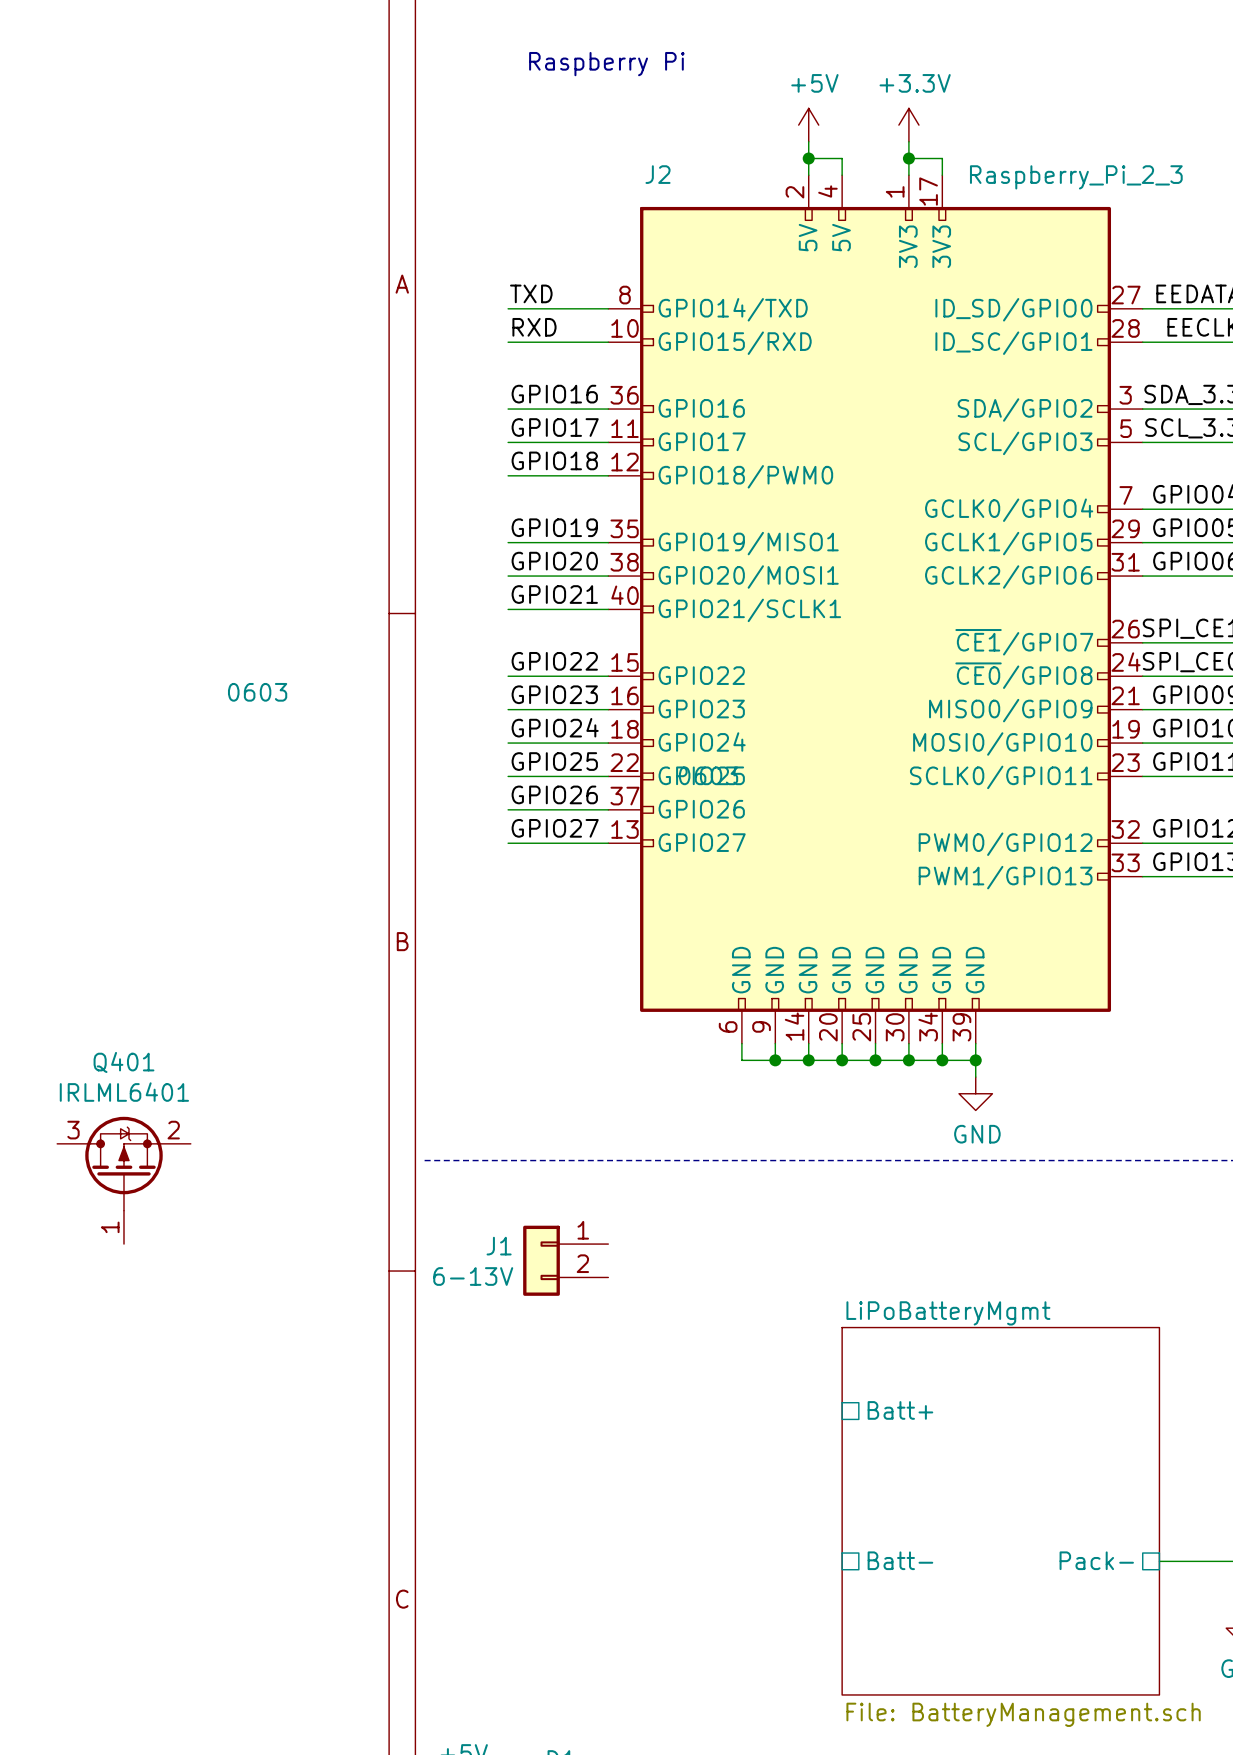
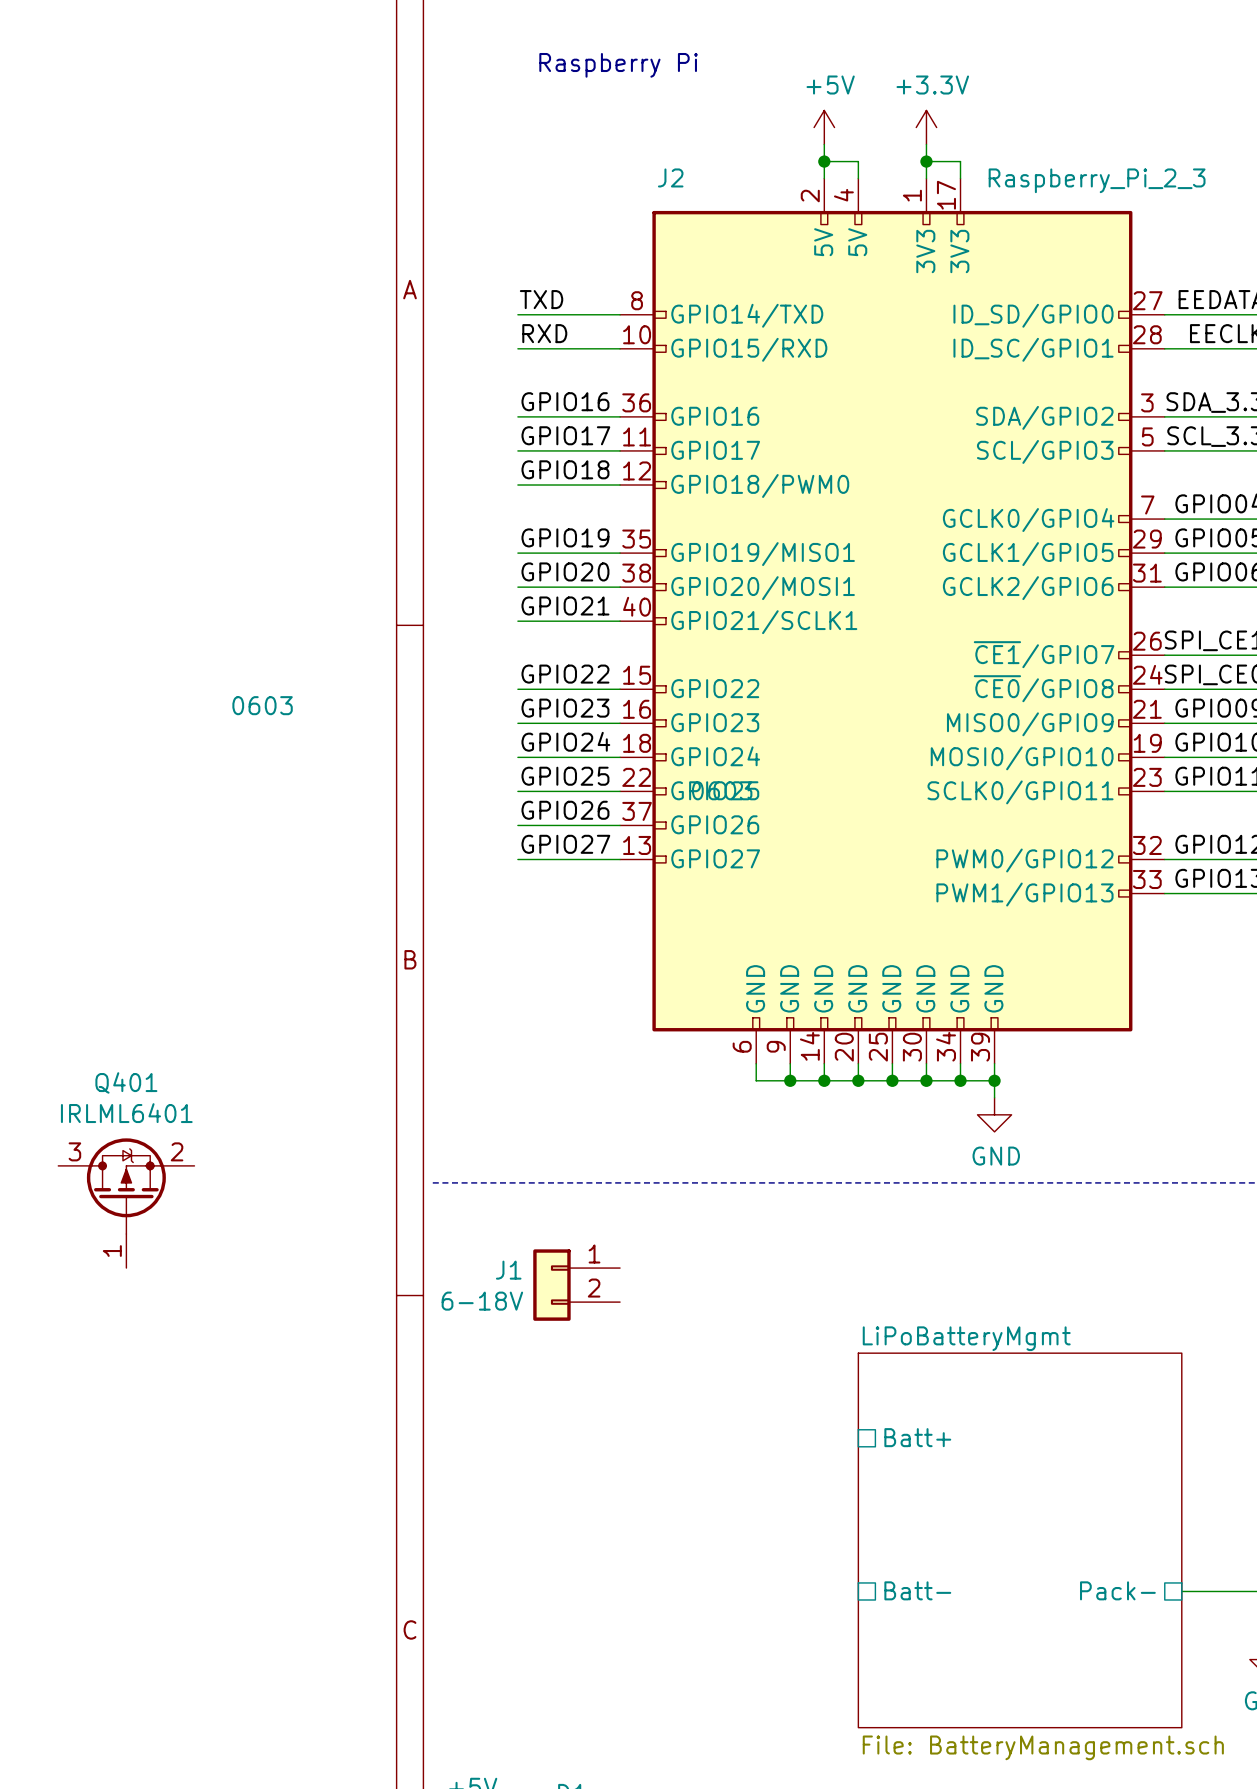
J1 value: 6-13V (473, 1276) -> 6-18V (482, 1301)

